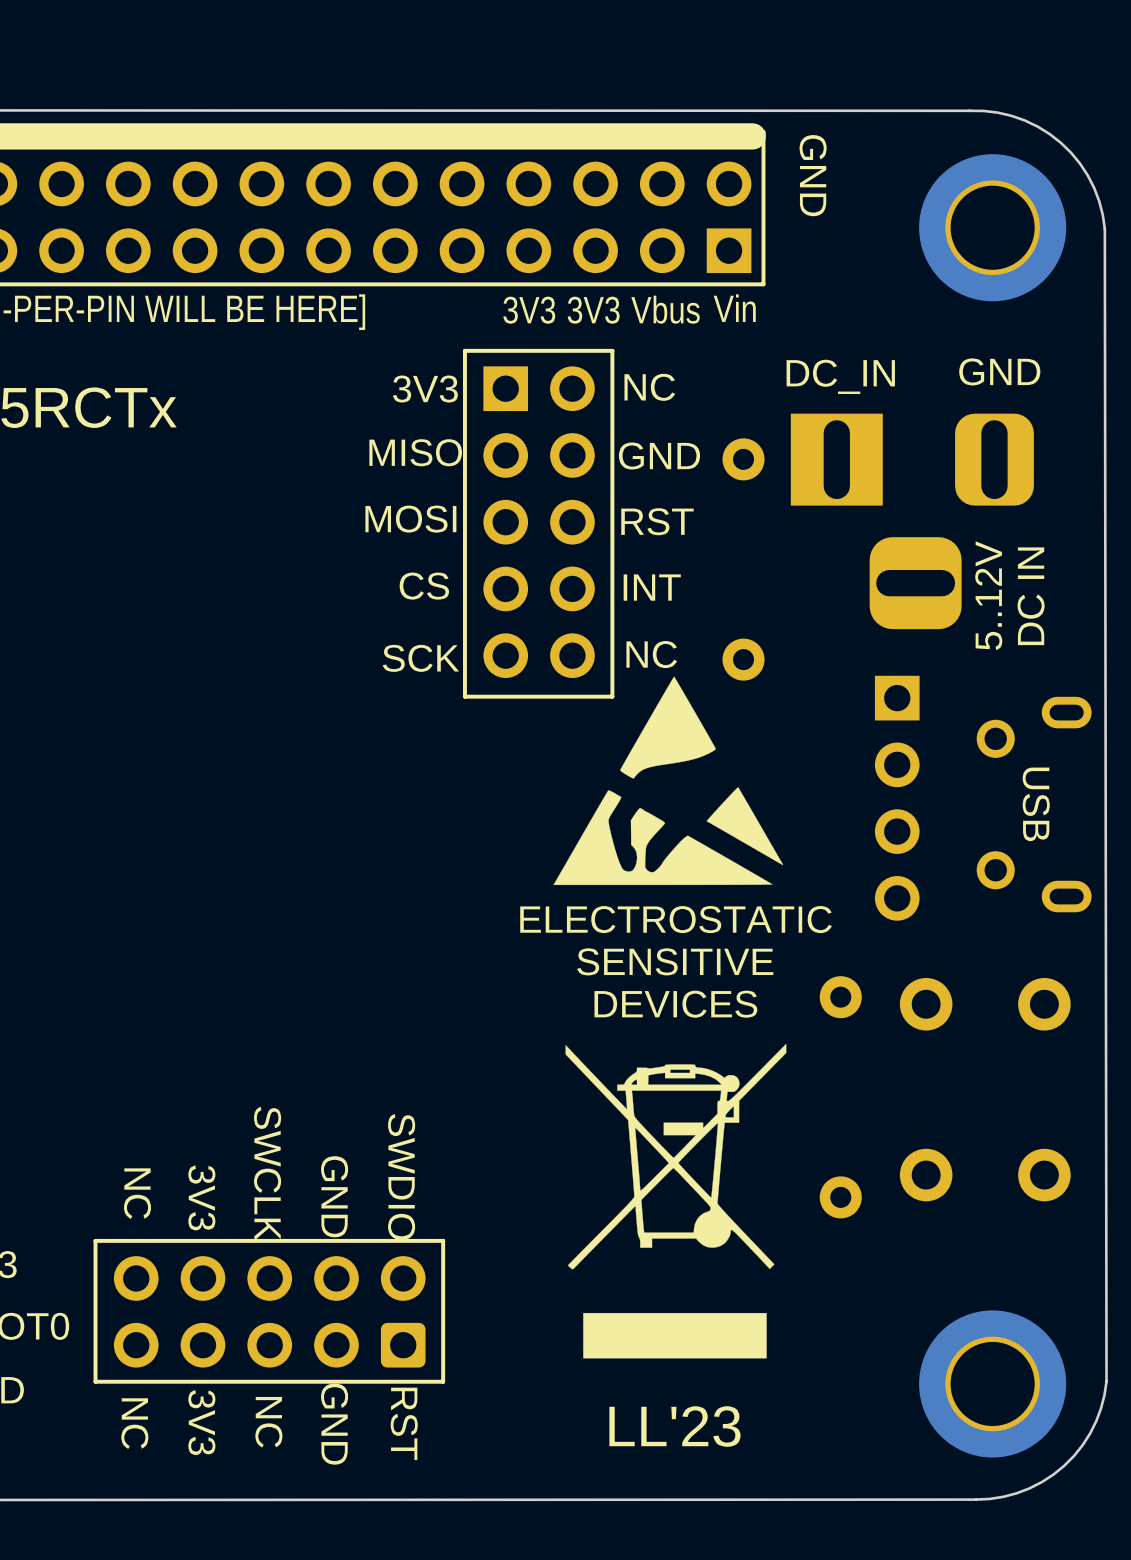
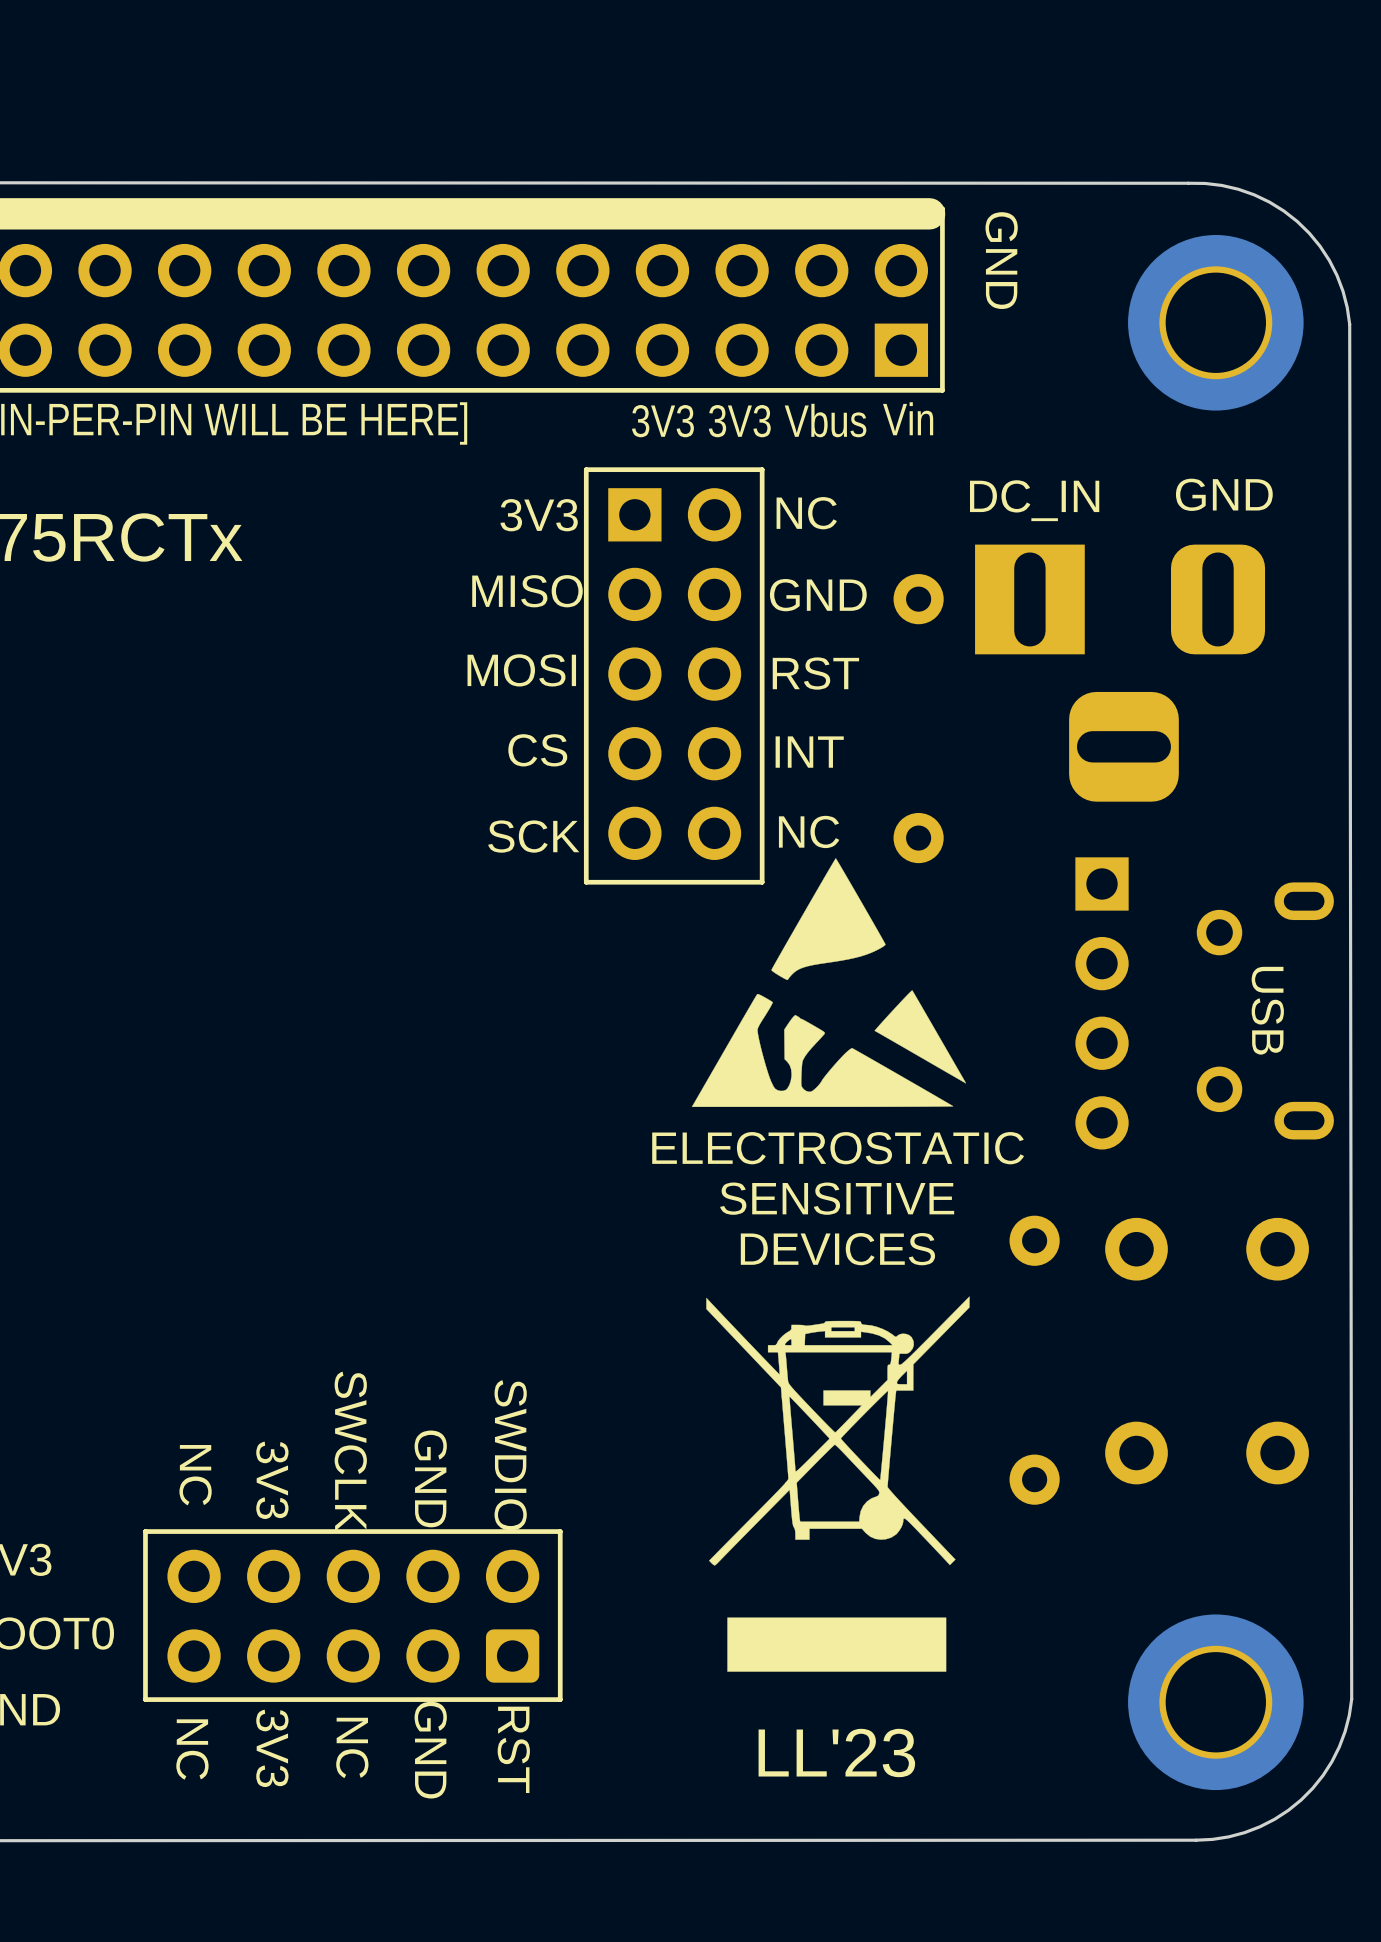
text: 5..12V (988, 595) -> none
text: DC IN (1031, 596) -> none

